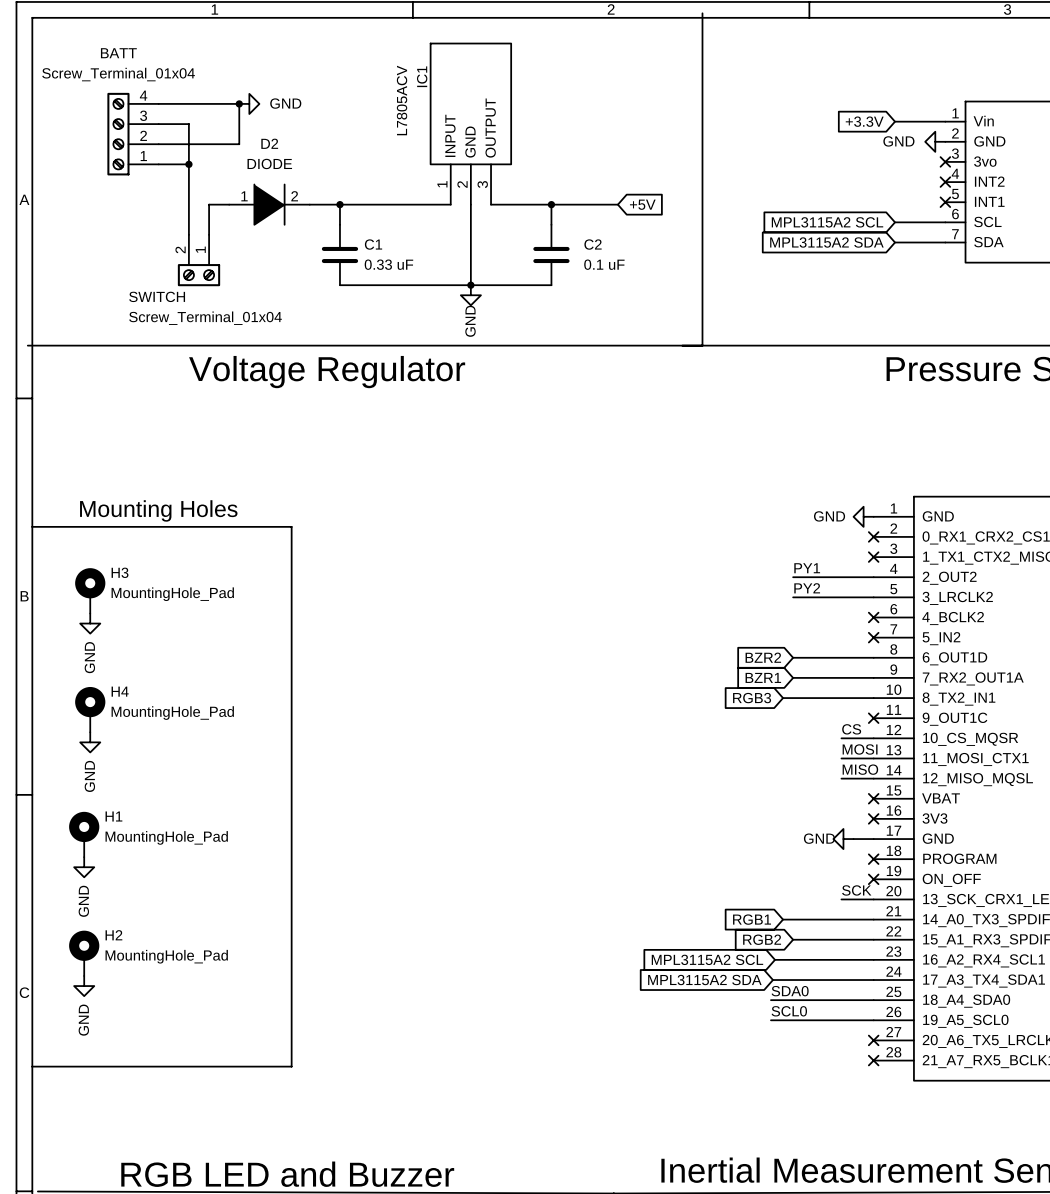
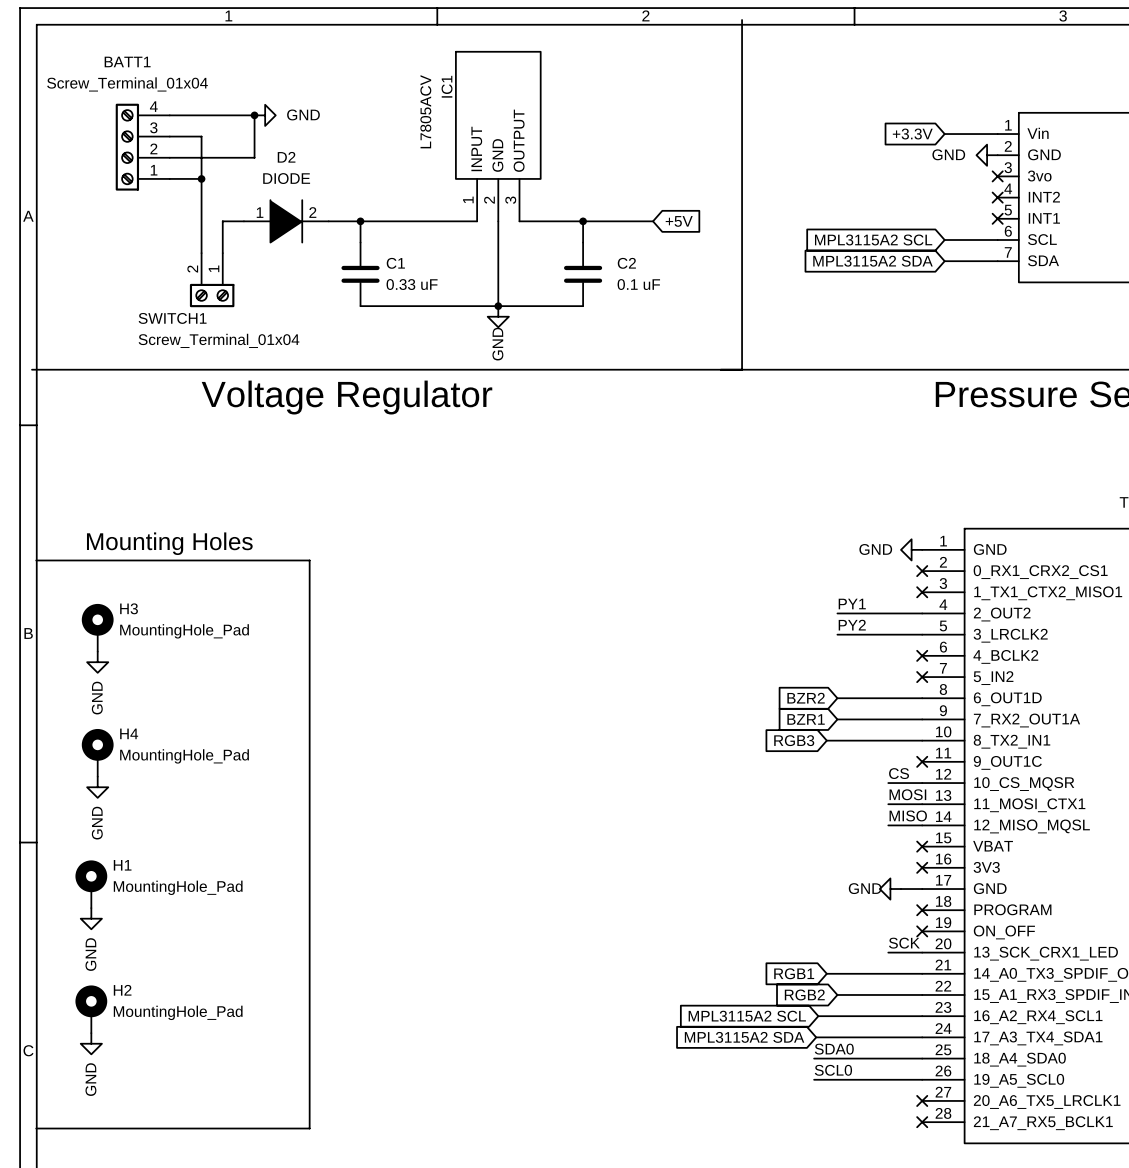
BATT name: BATT (118, 53) -> BATT1 (127, 61)
SWITCH name: SWITCH (157, 296) -> SWITCH1 (172, 318)

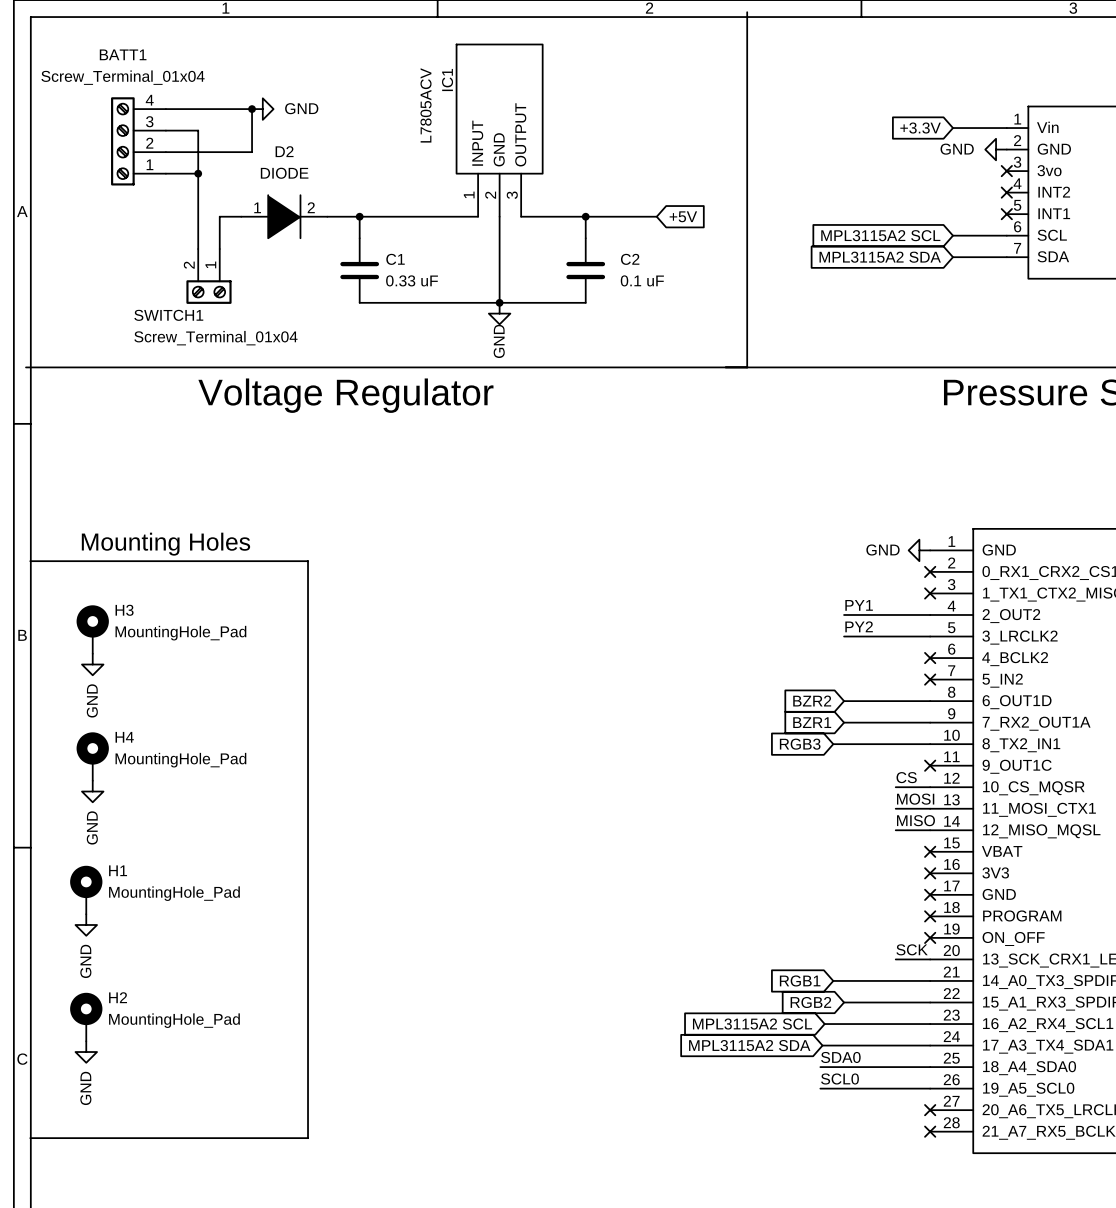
power symbol: GND (890, 889) -> none
wire: (901, 889) (922, 889) -> none
no-connect mark: none -> (930, 894)

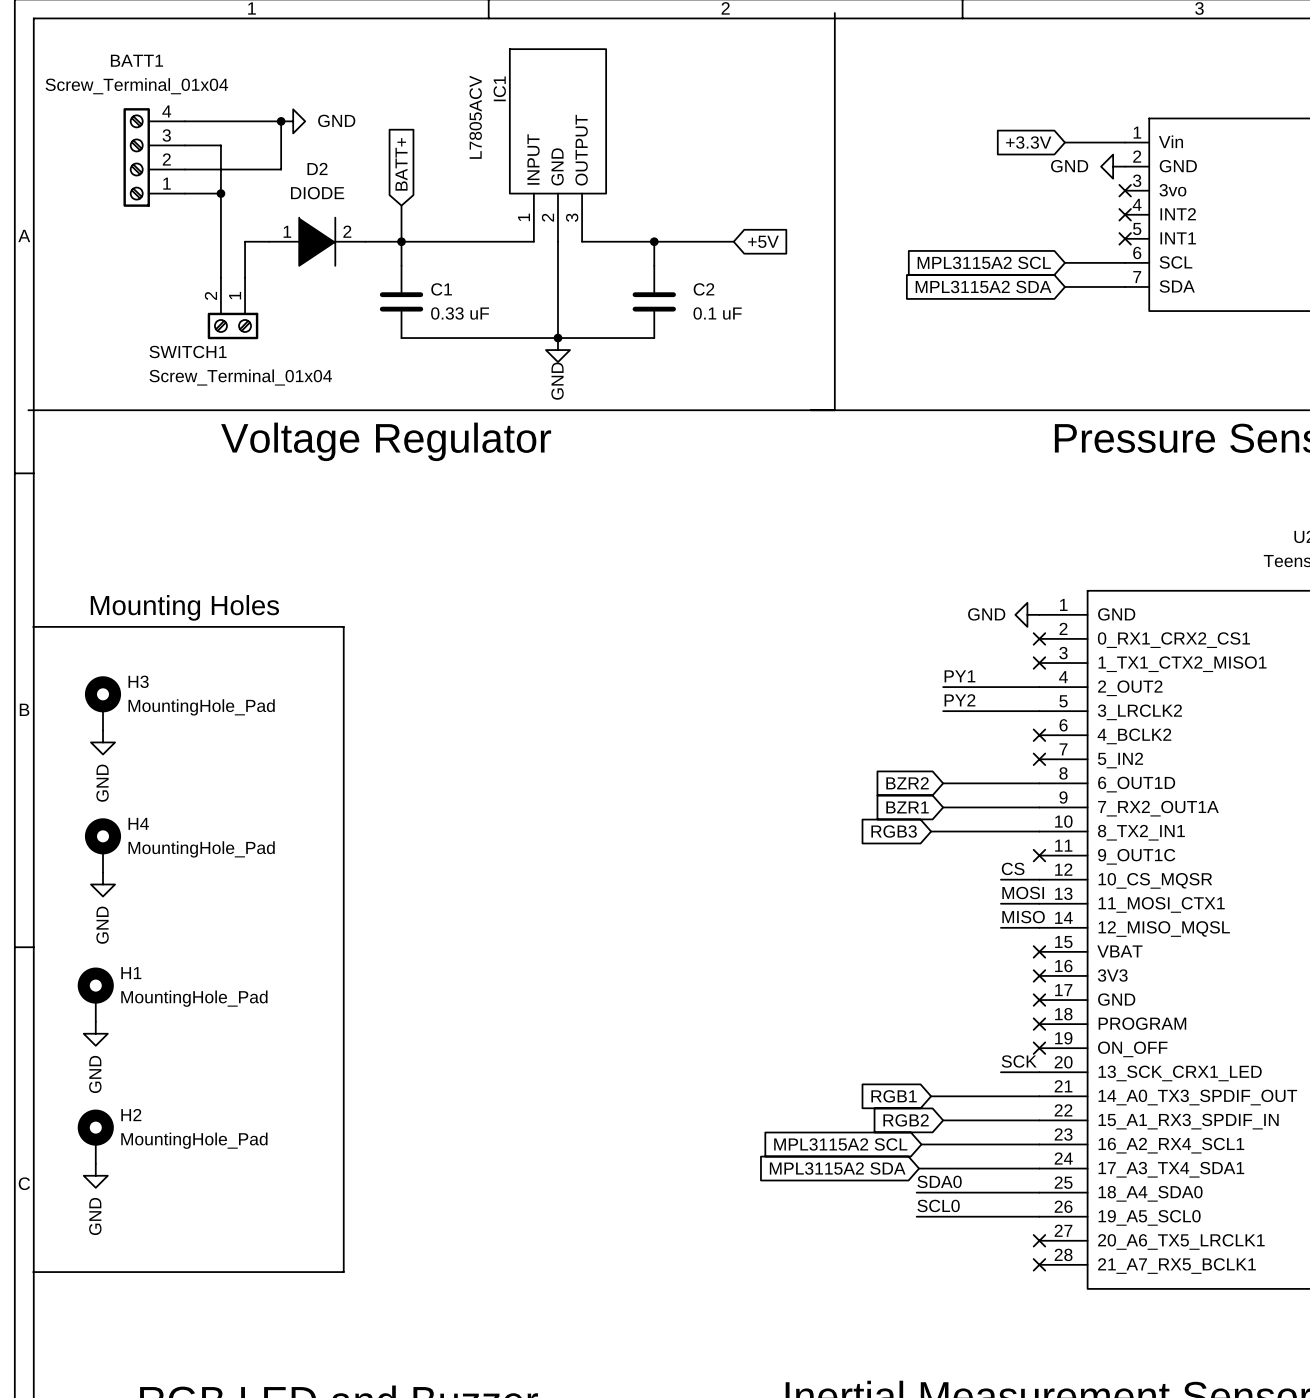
global label: none -> BATT+ (401, 164)
wire: none -> (401, 205) (401, 241)

